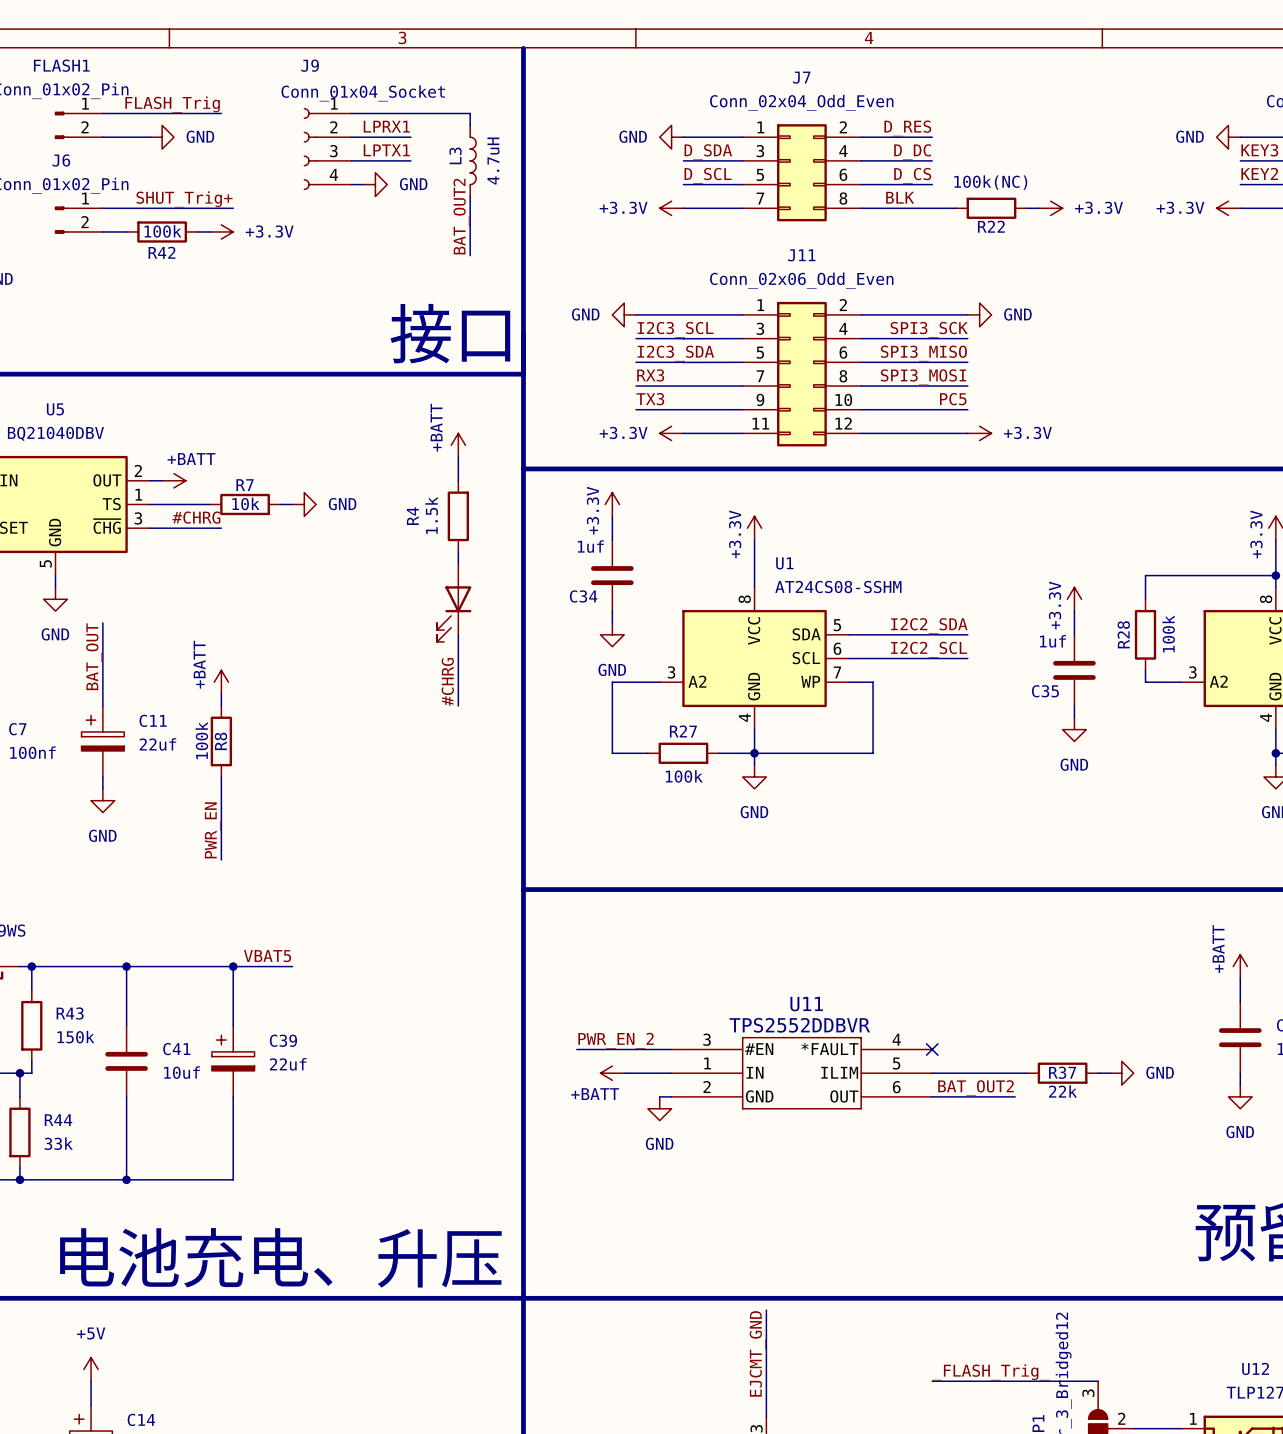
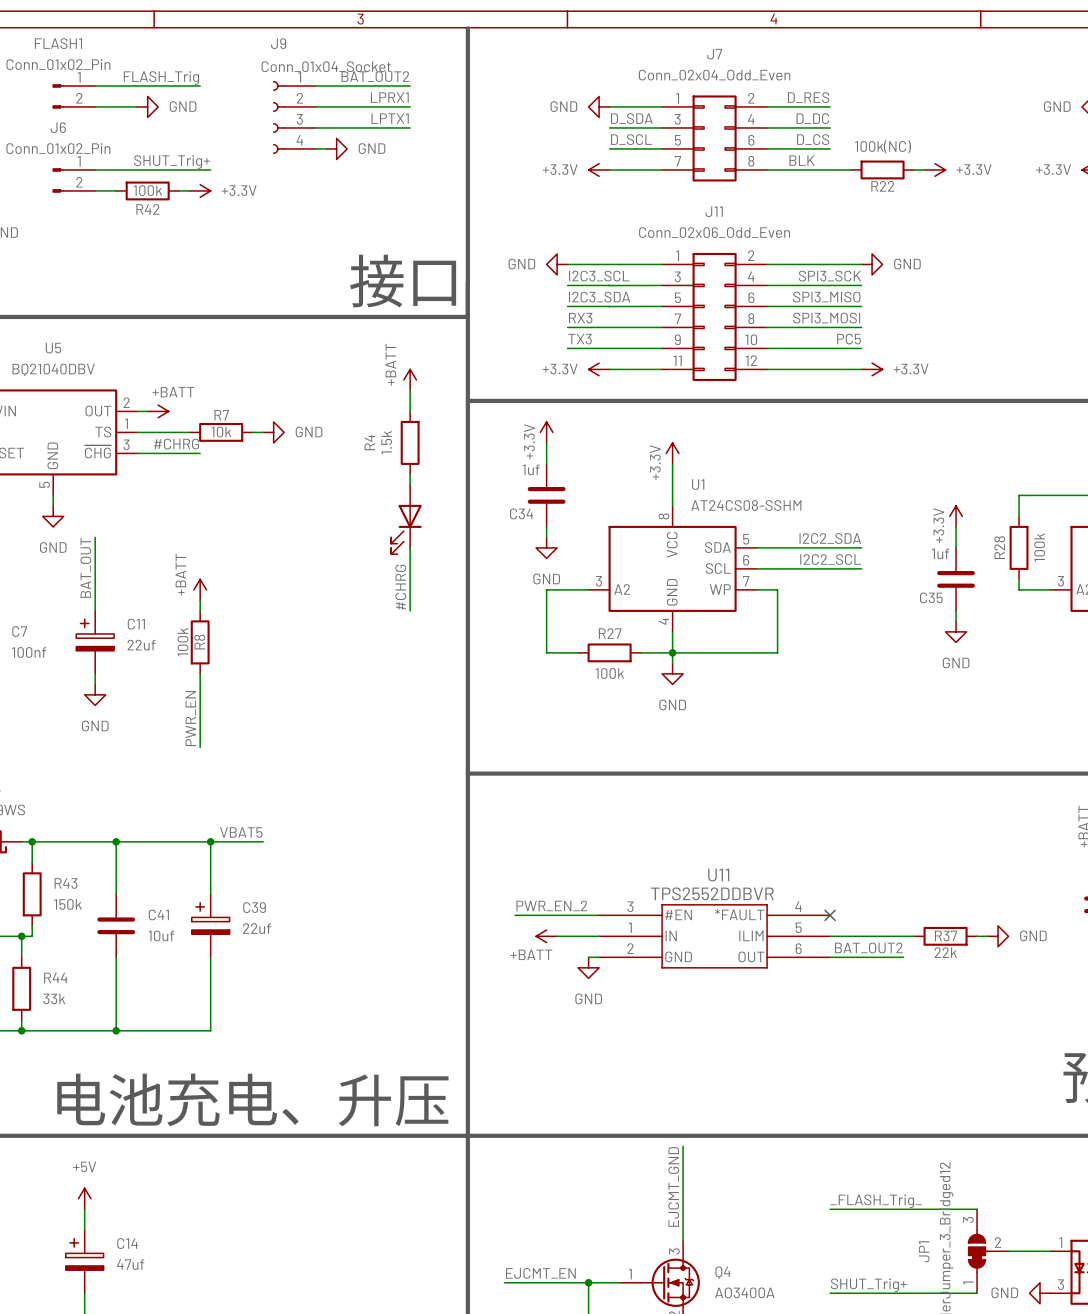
wire: (458, 113) (470, 113) (470, 125) -> none
label position: LPRX1 (386, 126) -> LPRX1 (389, 97)
wire: none -> (368, 106) (410, 106)
label position: LPTX1 (386, 150) -> LPTX1 (390, 118)
wire: none -> (368, 127) (410, 127)
L3: 4.7uH (473, 160) -> none
wire: (470, 196) (470, 255) -> none
label rotation: 0° (461, 216) -> 90° clockwise (375, 76)
label position: BAT_OUT2 (461, 216) -> BAT_OUT2 (375, 76)

